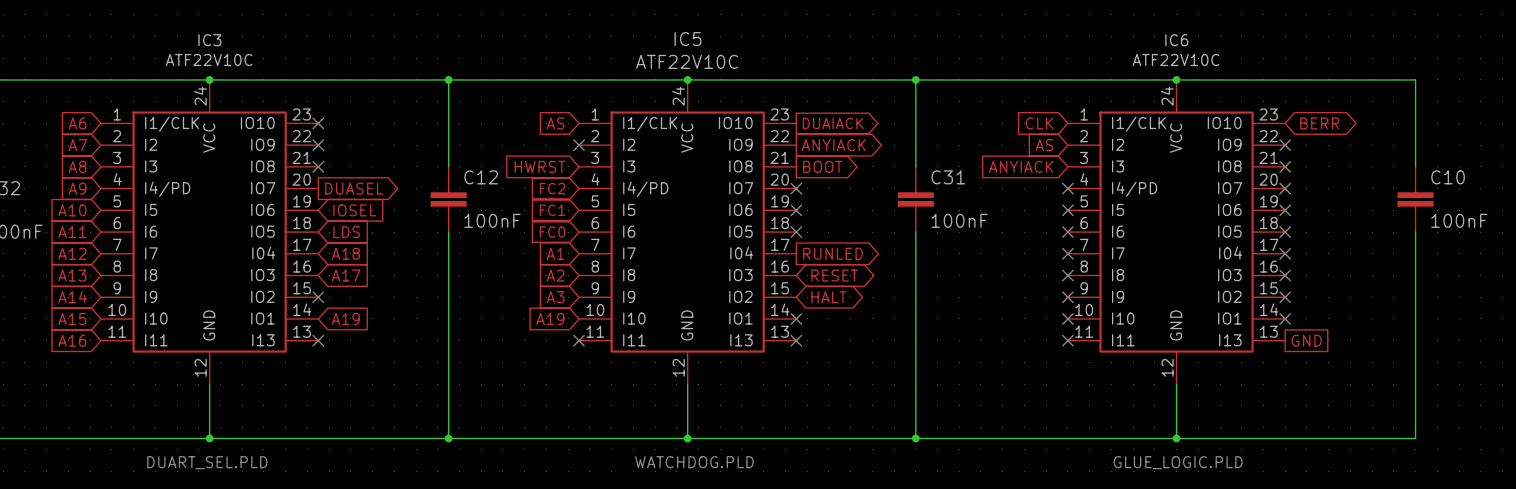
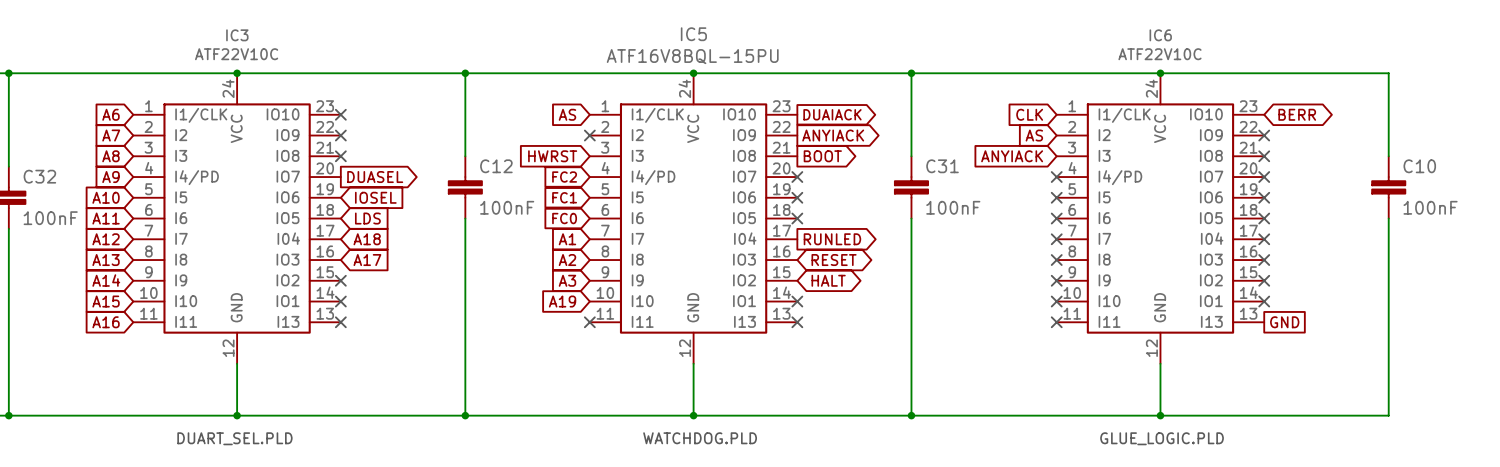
IC5 value: ATF22V10C (687, 61) -> ATF16V8BQL-15PU (692, 56)
no-connect mark: none -> (340, 301)
global label: A19 (345, 318) -> none

